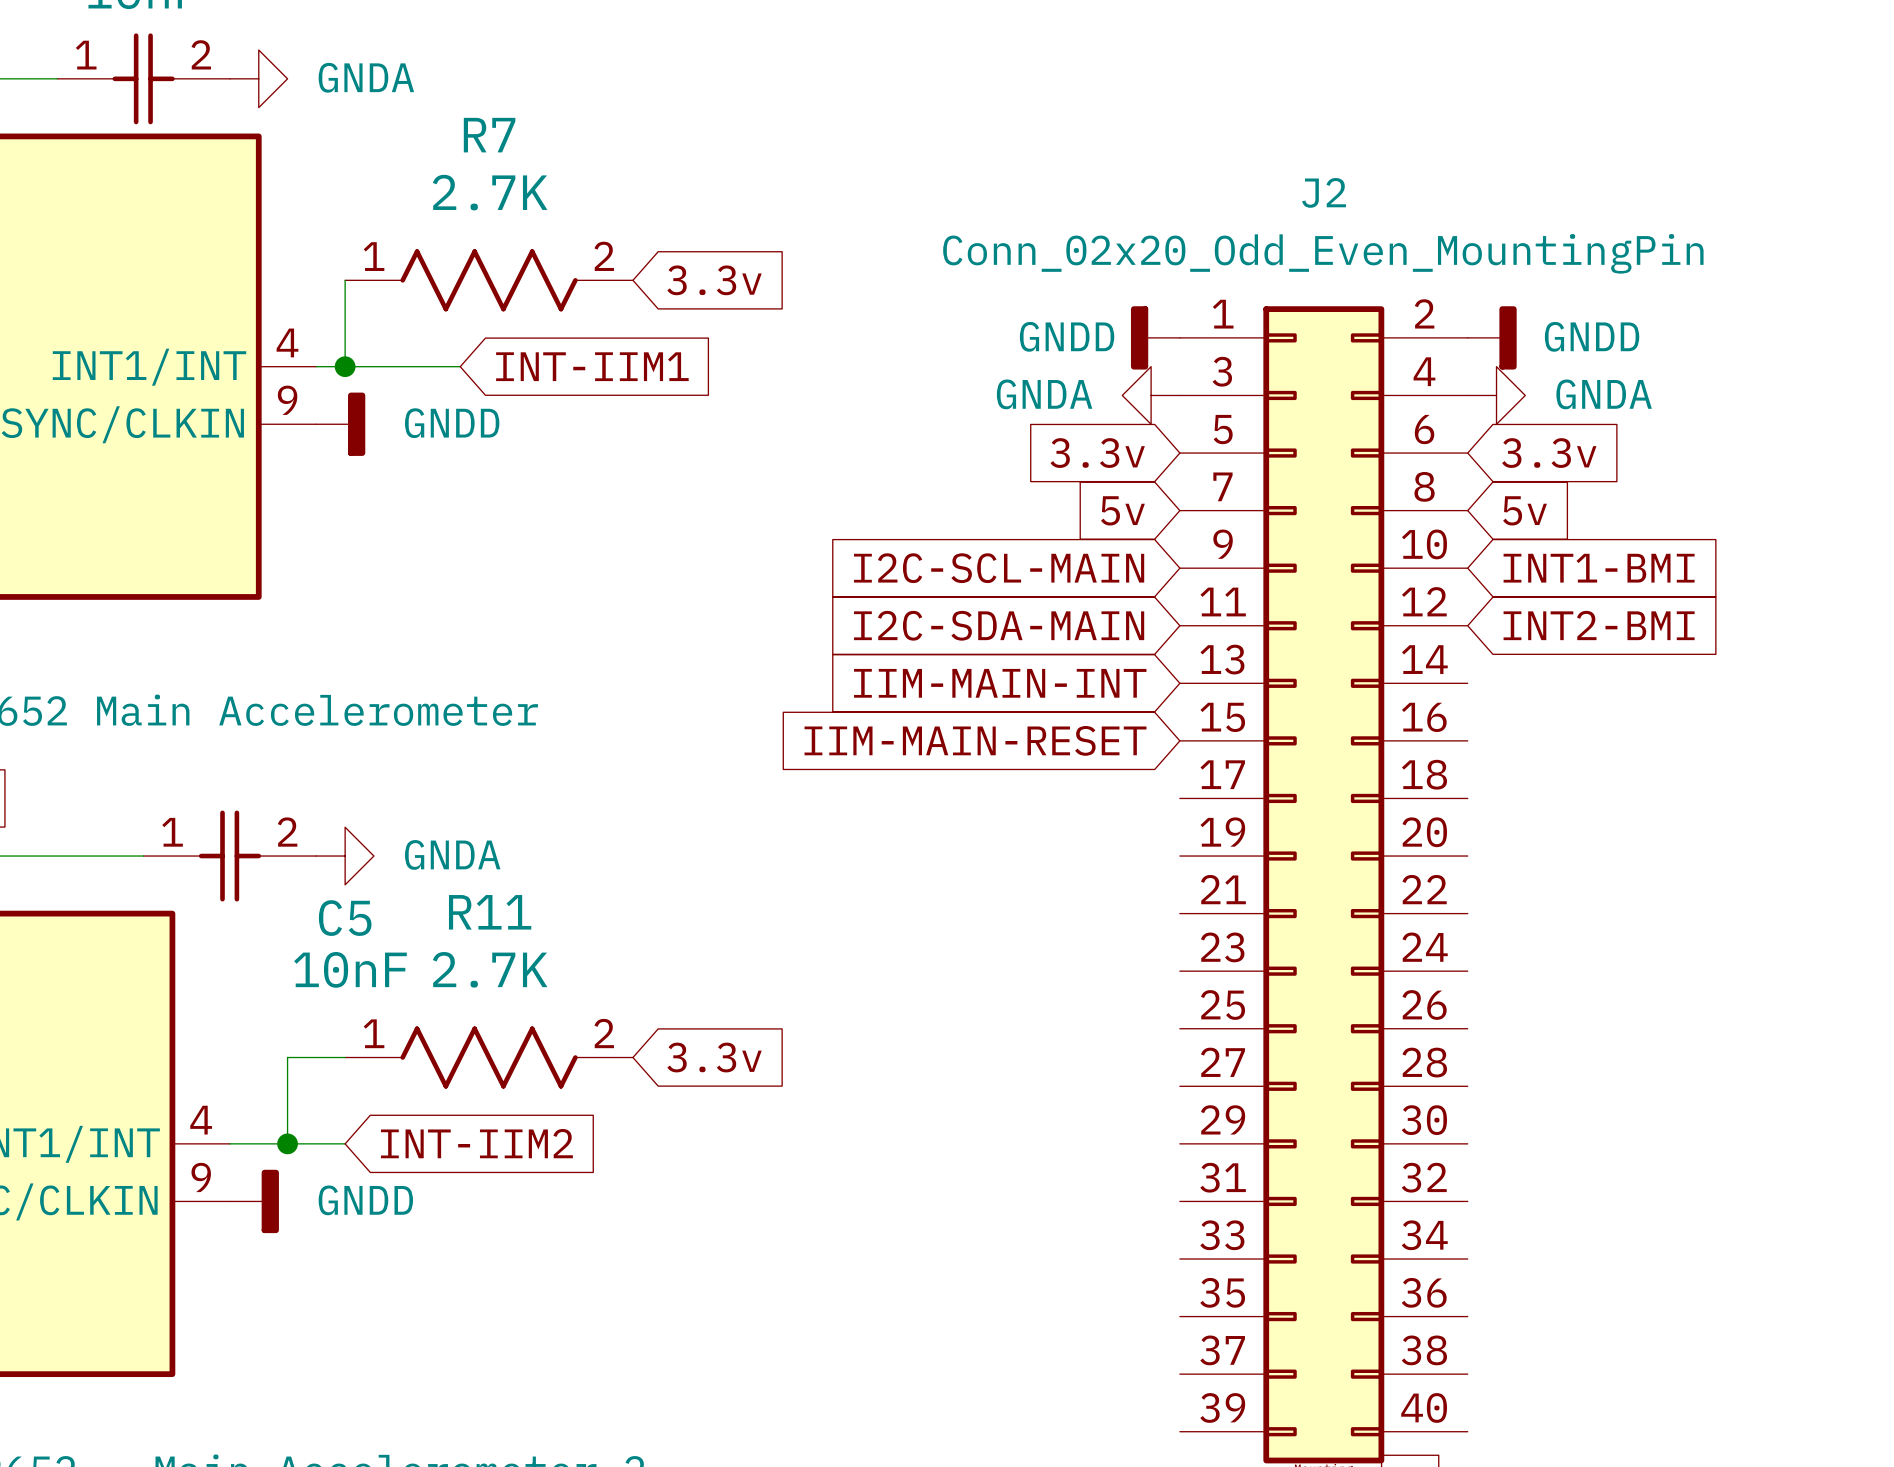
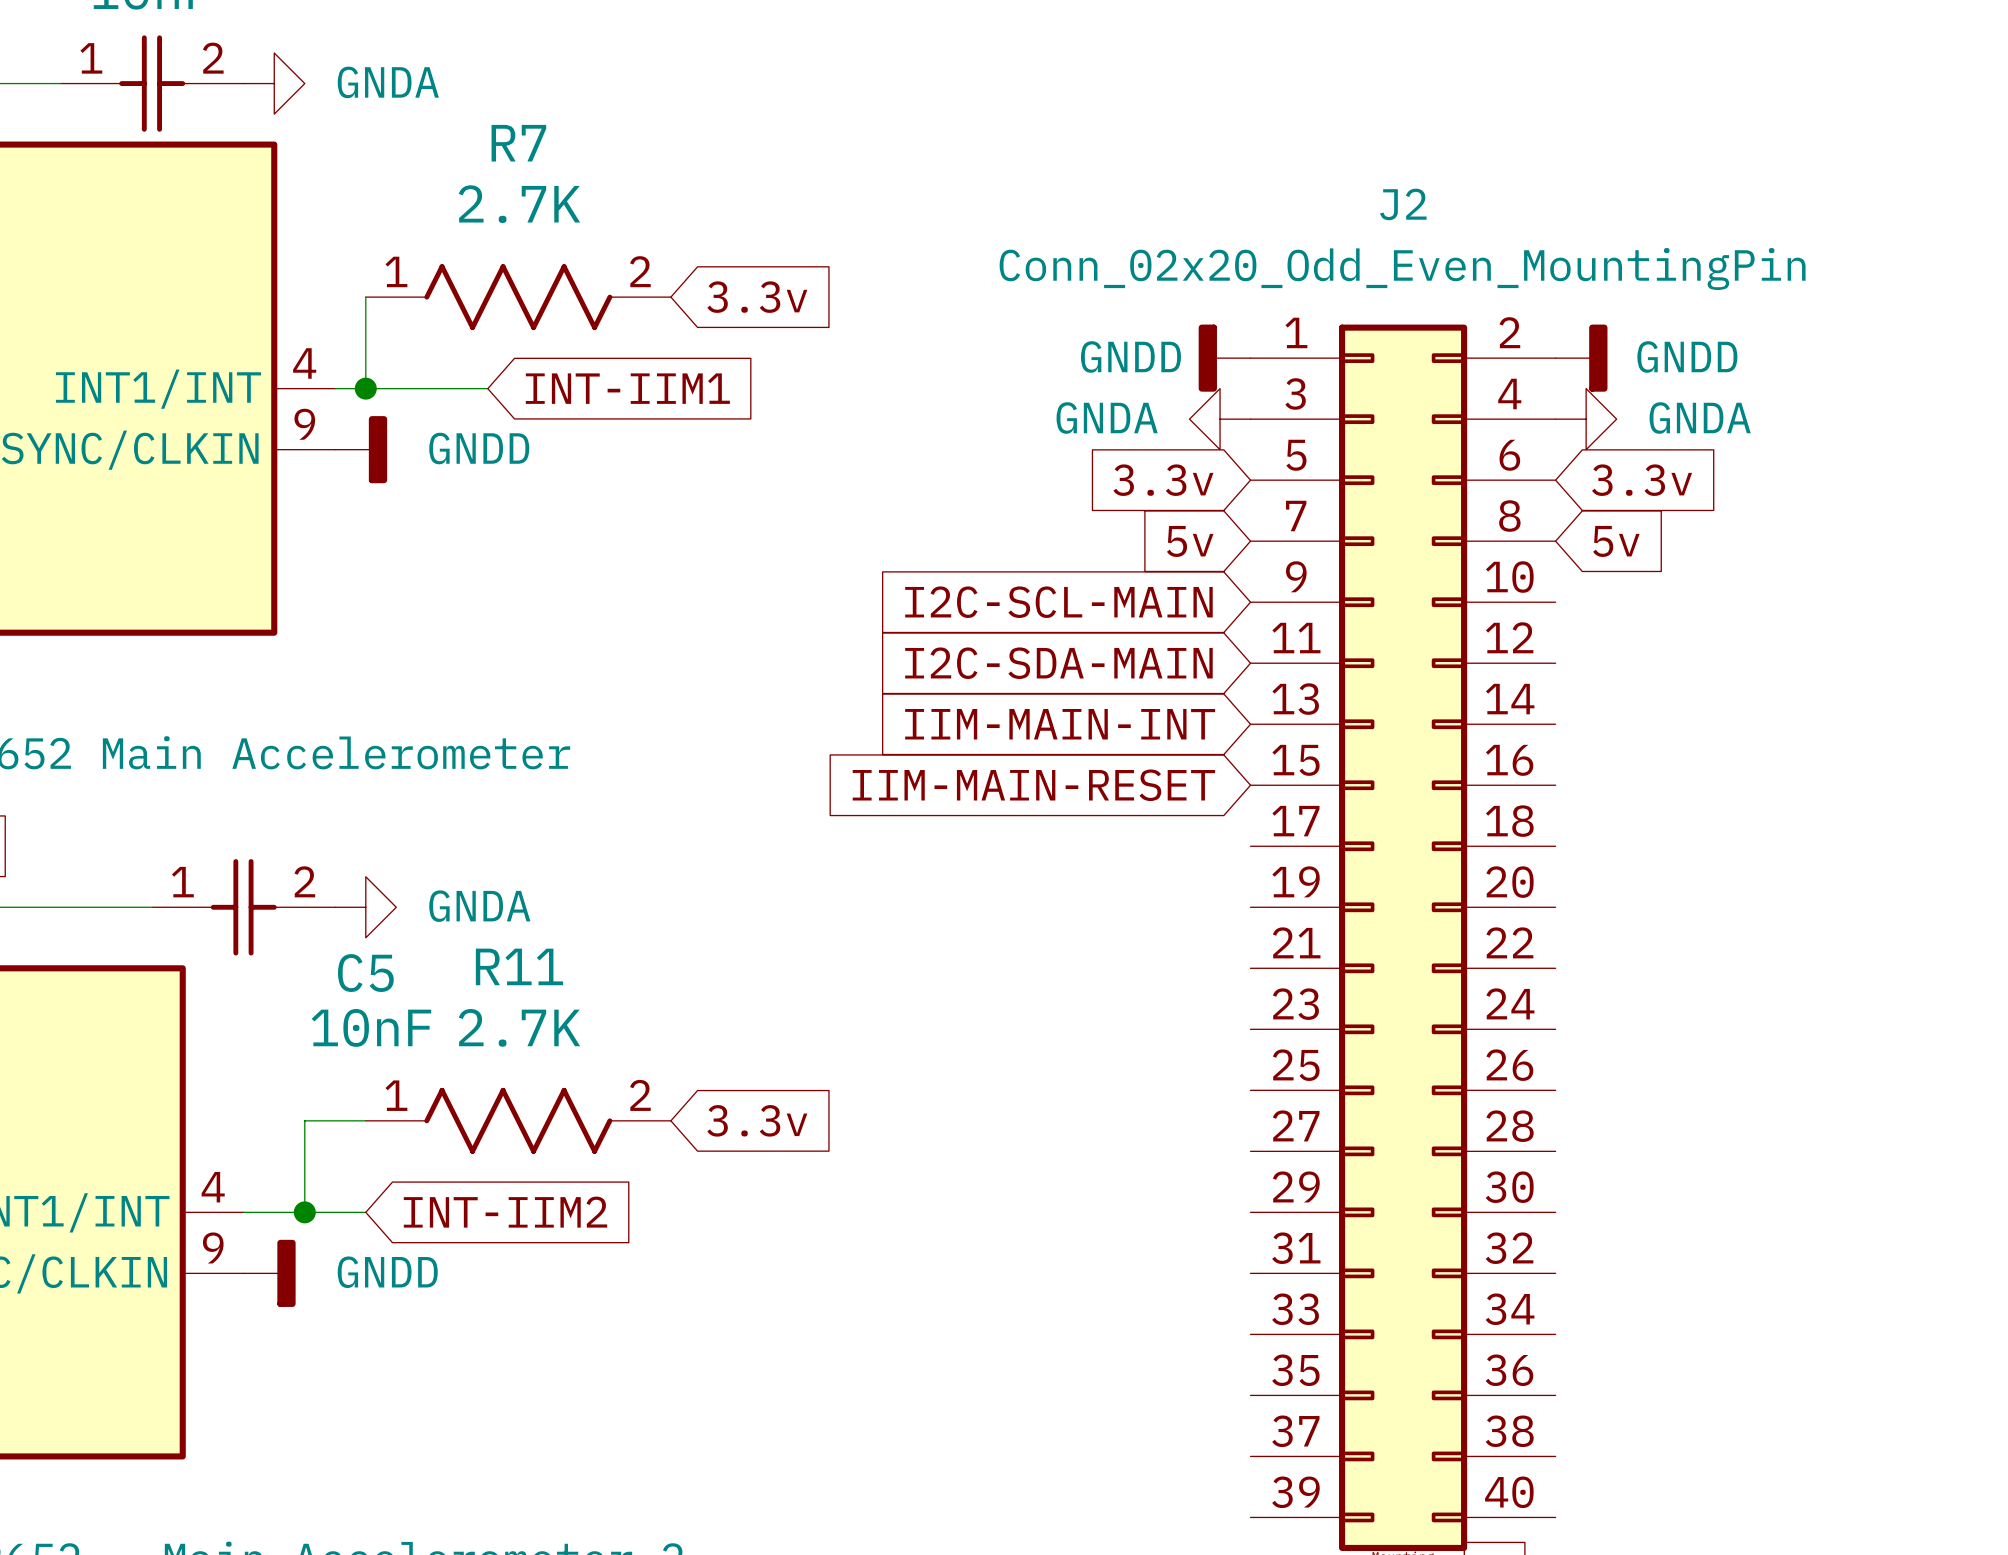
global label: INT1-BMI (1599, 568) -> none
global label: INT2-BMI (1599, 625) -> none

